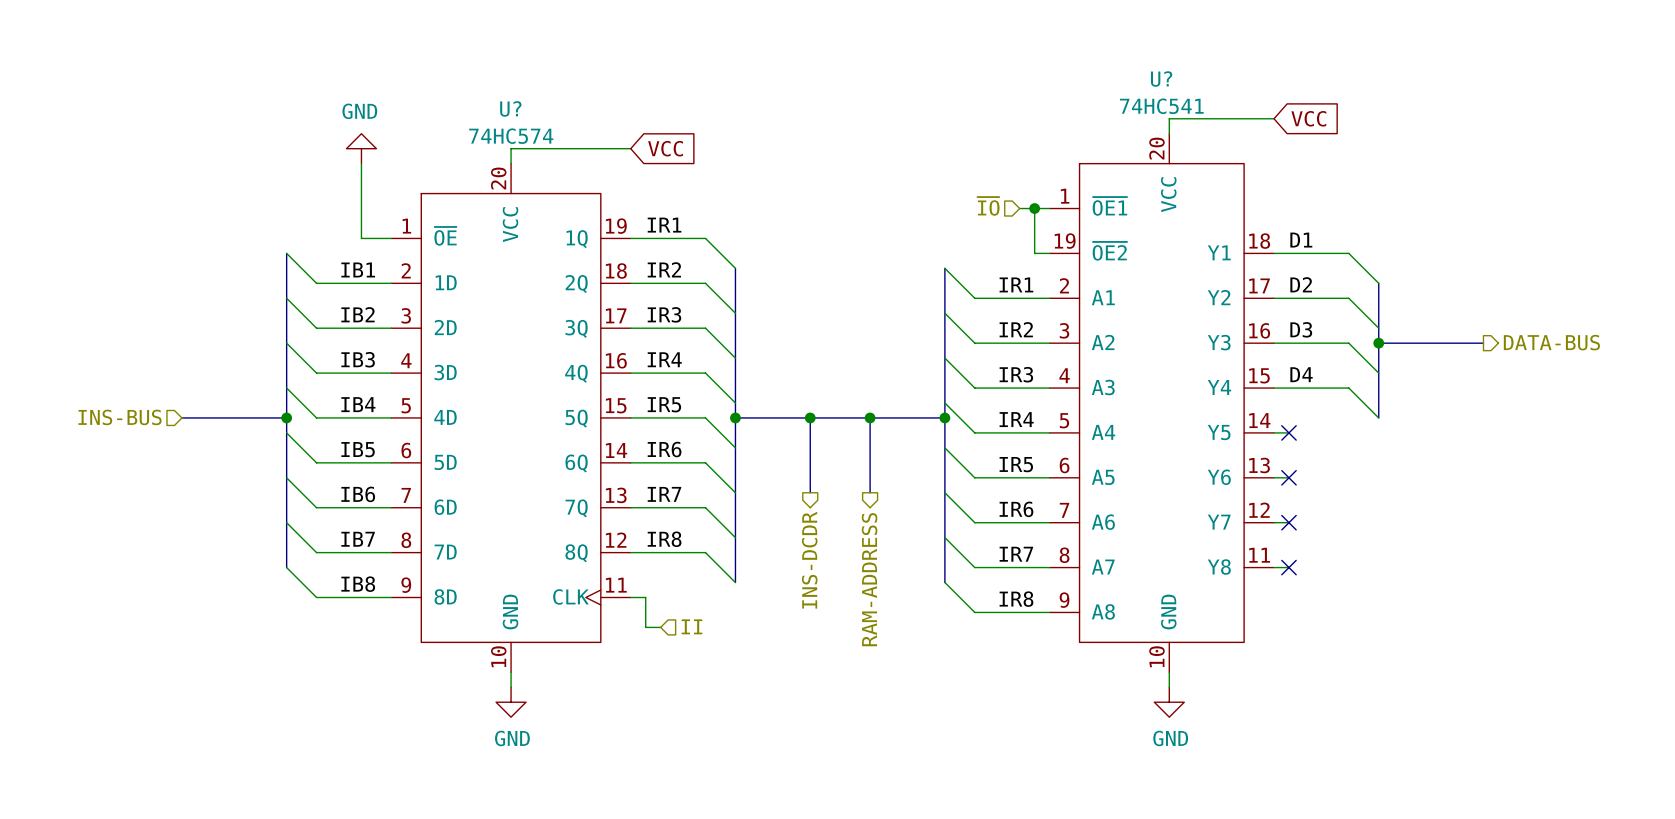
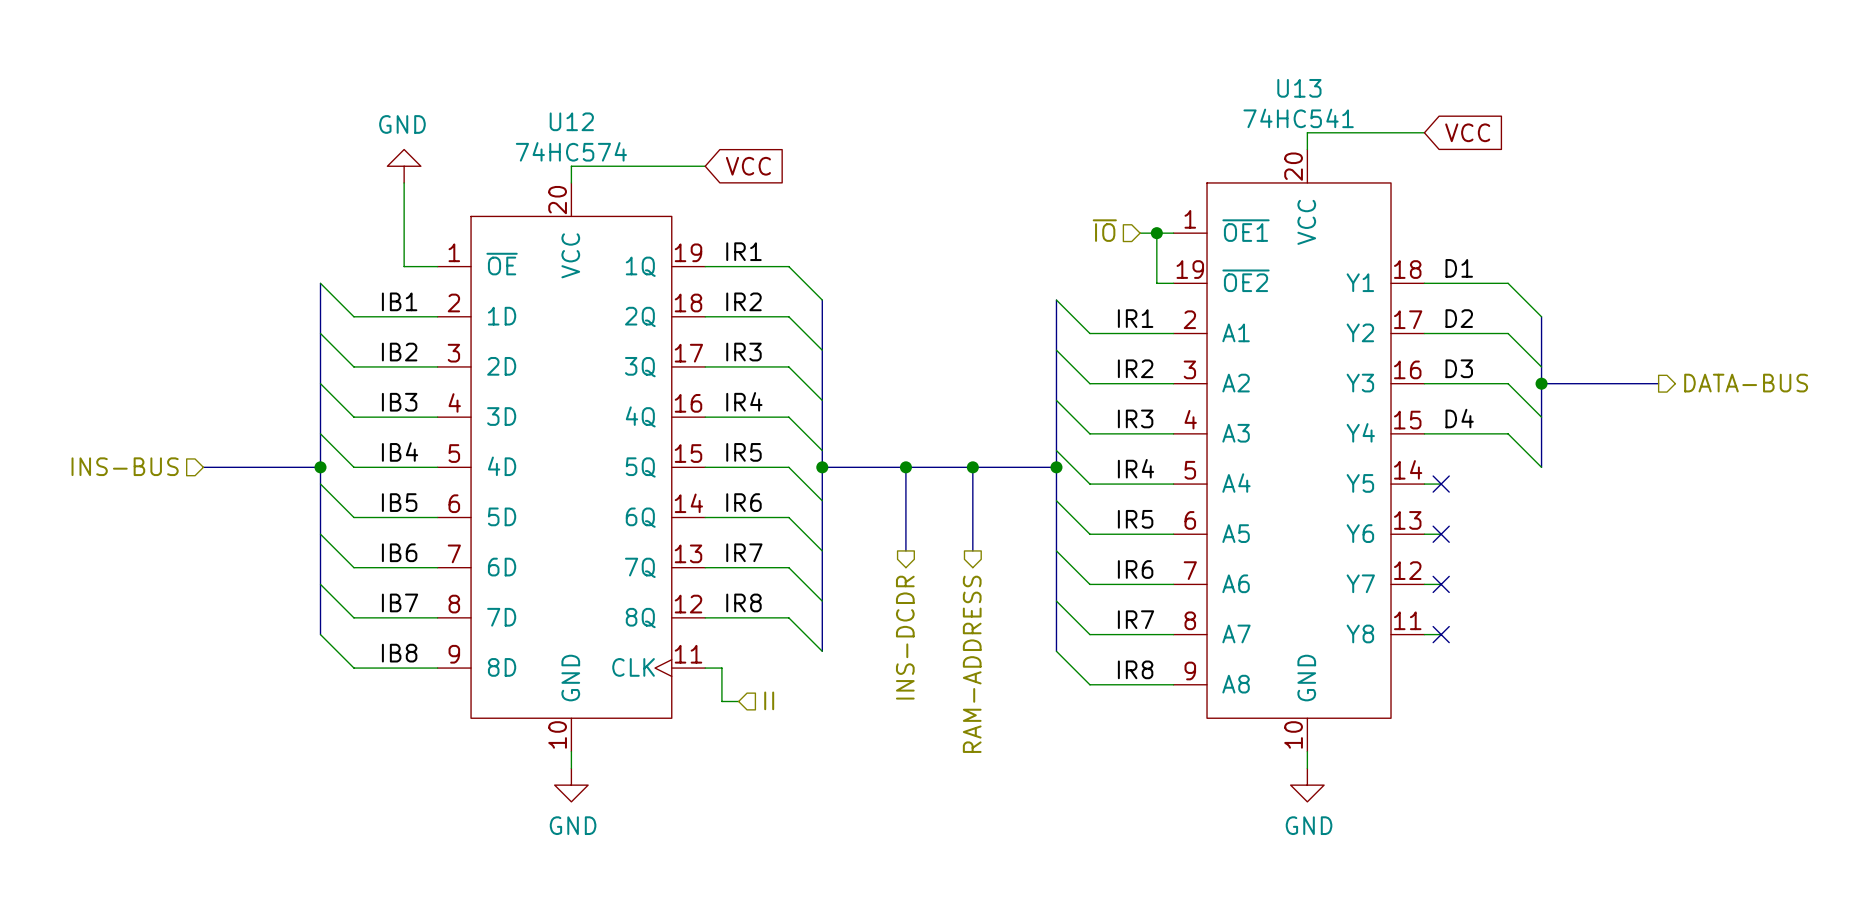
U? name: U? (1161, 79) -> U13 (1299, 88)
U? name: U? (510, 108) -> U12 (571, 121)

